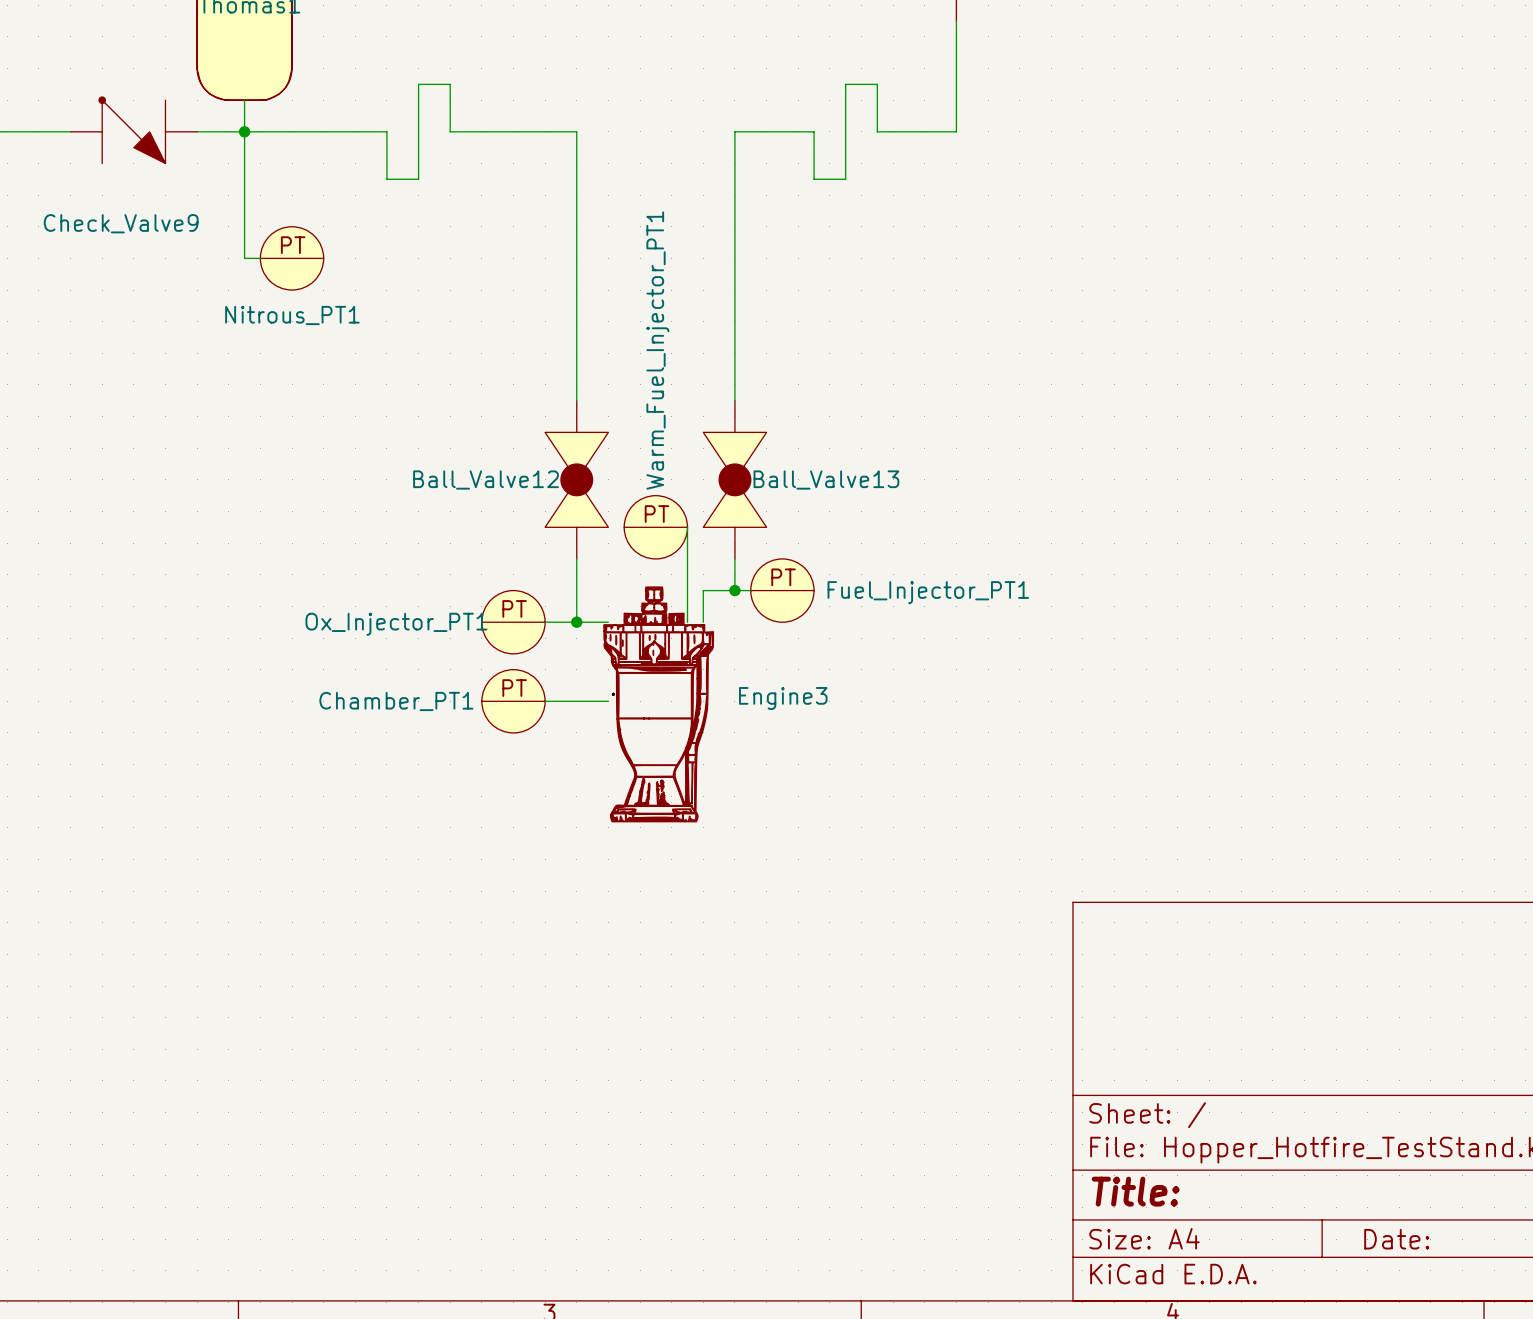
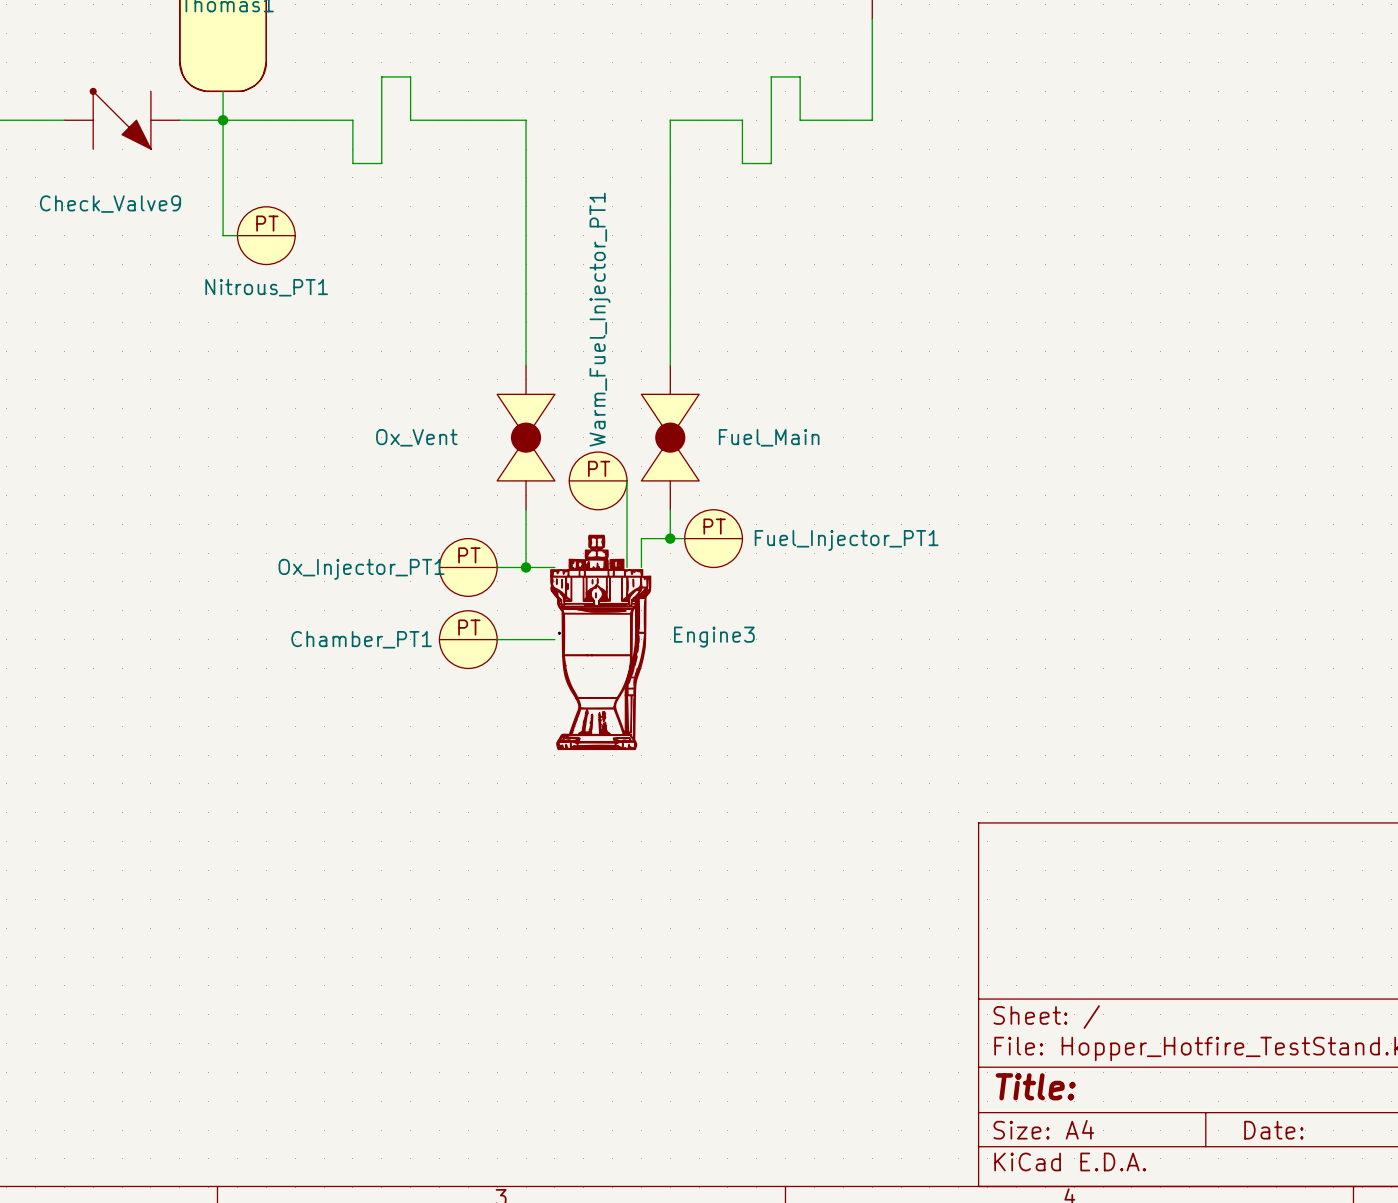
Ball_Valve12 name: Ball_Valve12 (486, 480) -> Ox_Vent (416, 437)
Ball_Valve13 name: Ball_Valve13 (826, 480) -> Fuel_Main (769, 437)

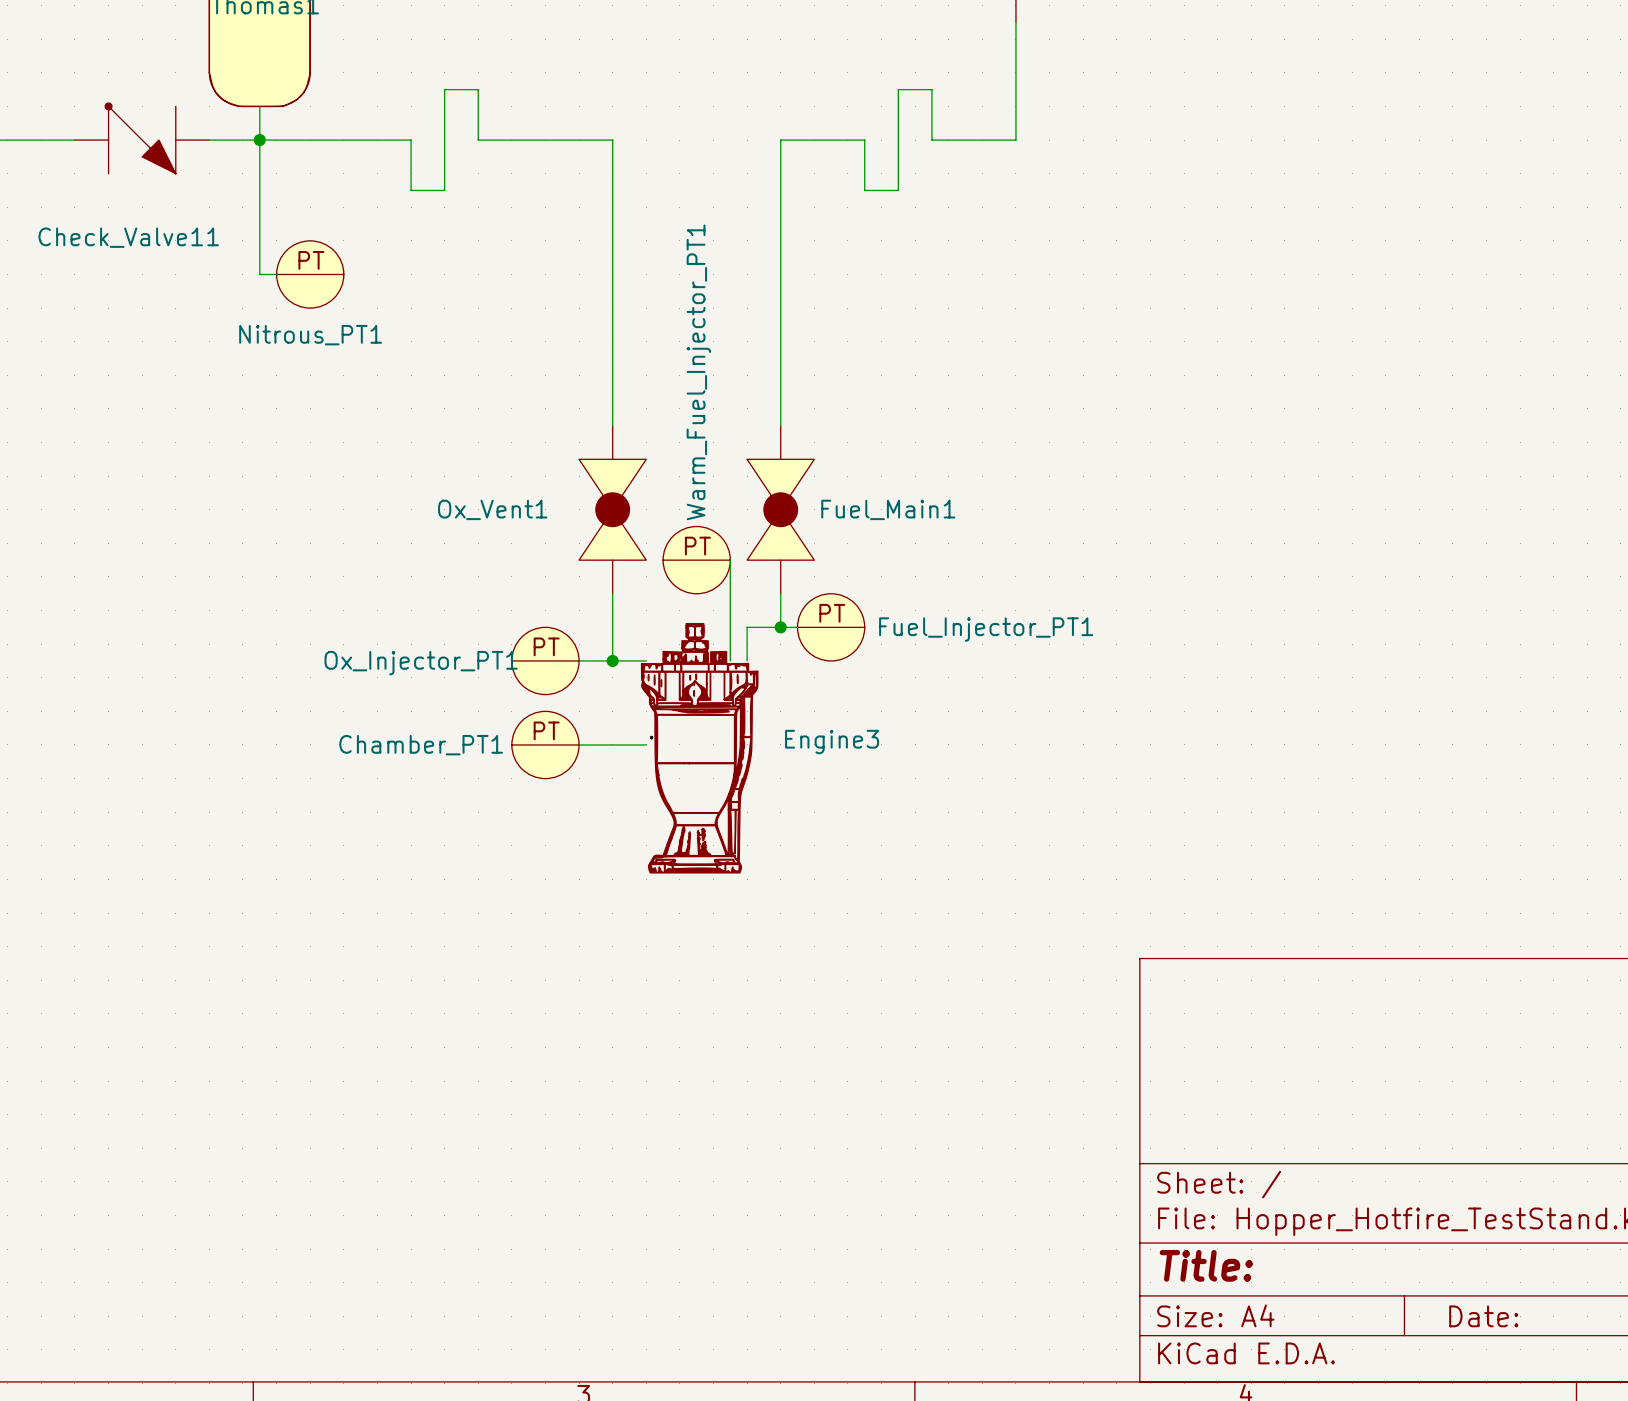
Check_Valve9 name: Check_Valve9 (110, 204) -> Check_Valve11 (128, 237)
Ox_Vent name: Ox_Vent (416, 437) -> Ox_Vent1 (492, 509)
Fuel_Main name: Fuel_Main (769, 437) -> Fuel_Main1 (888, 509)

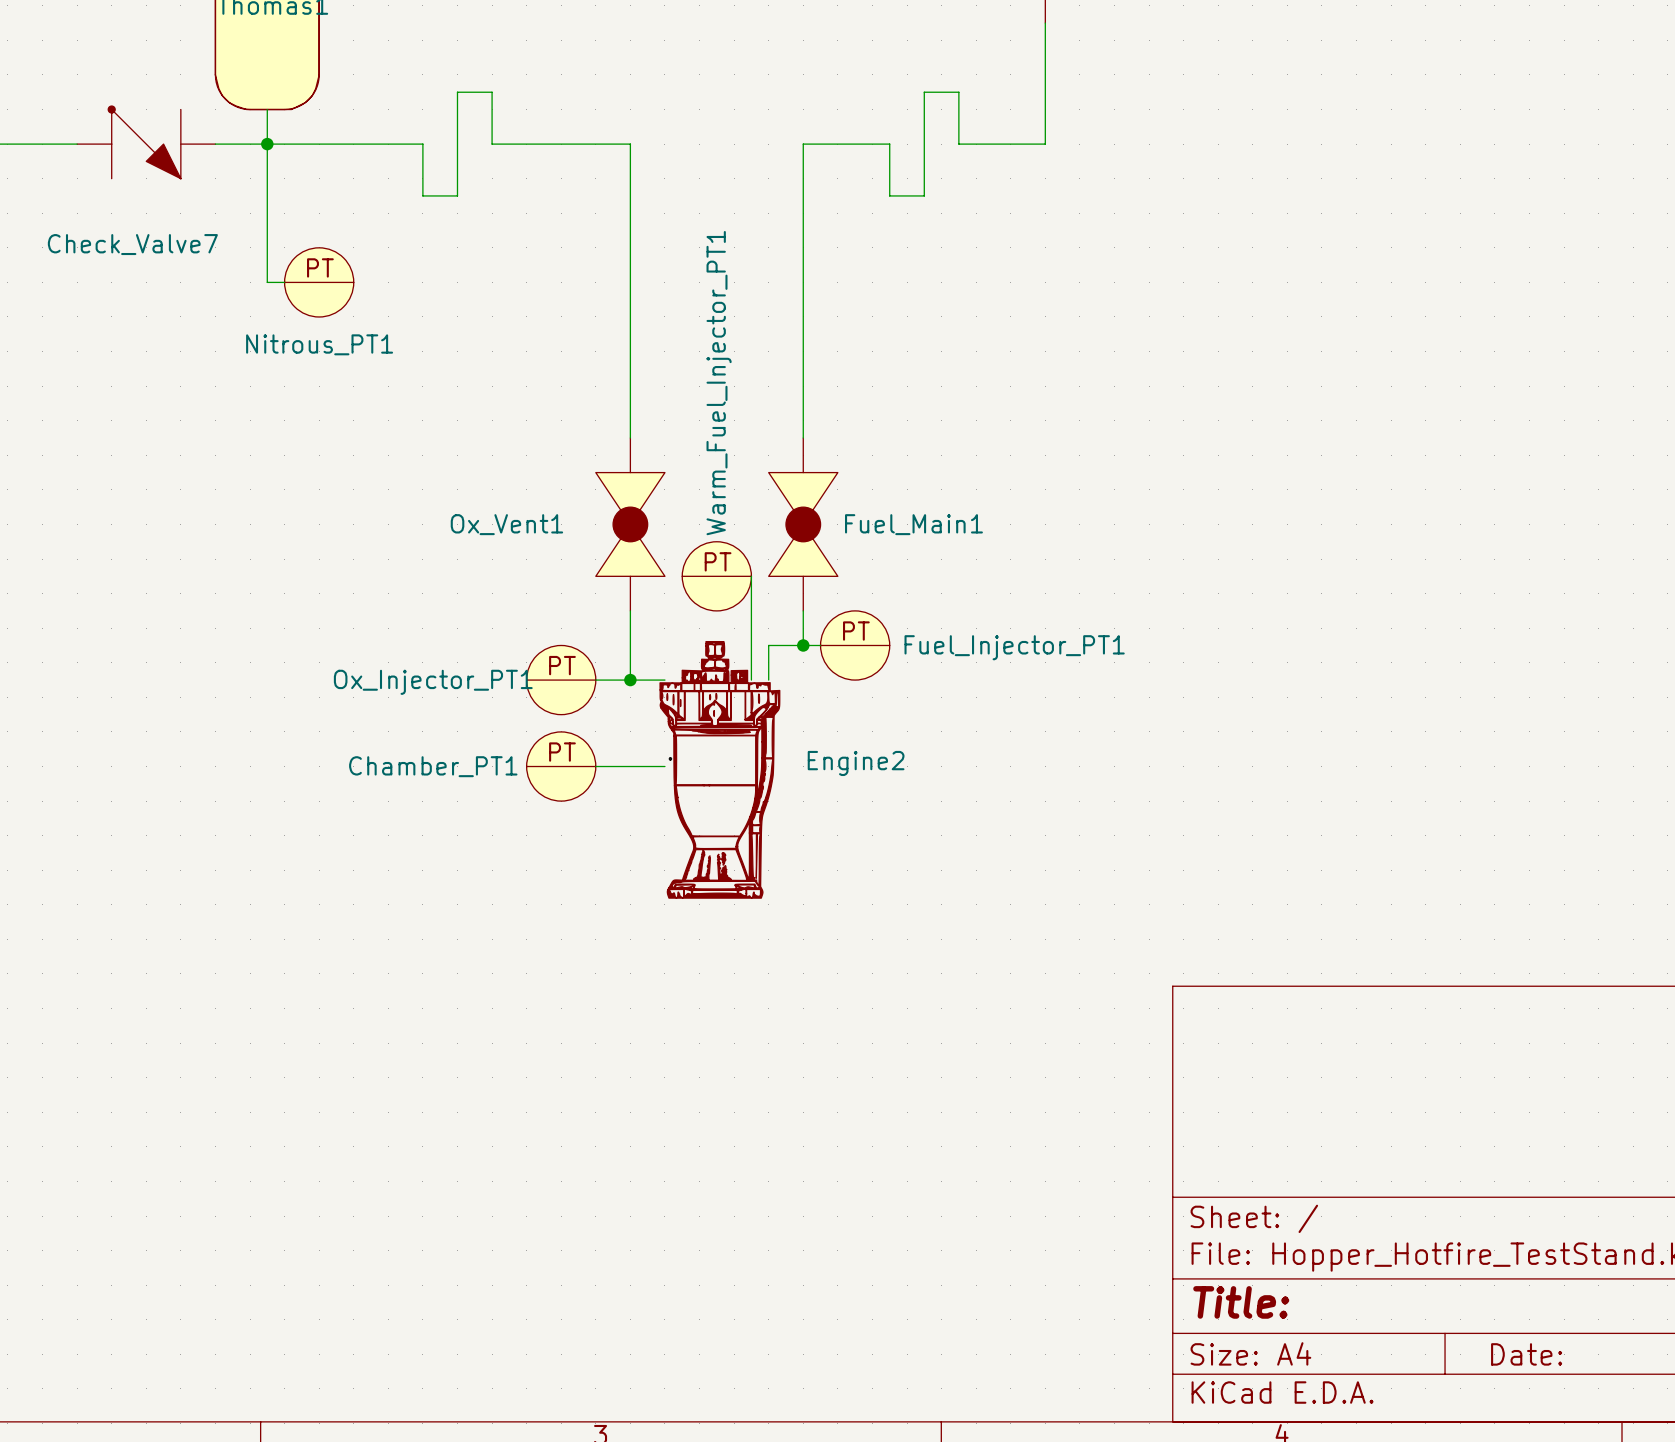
Check_Valve11 name: Check_Valve11 (128, 237) -> Check_Valve7 (132, 244)
Engine3 name: Engine3 (832, 742) -> Engine2 (856, 763)

